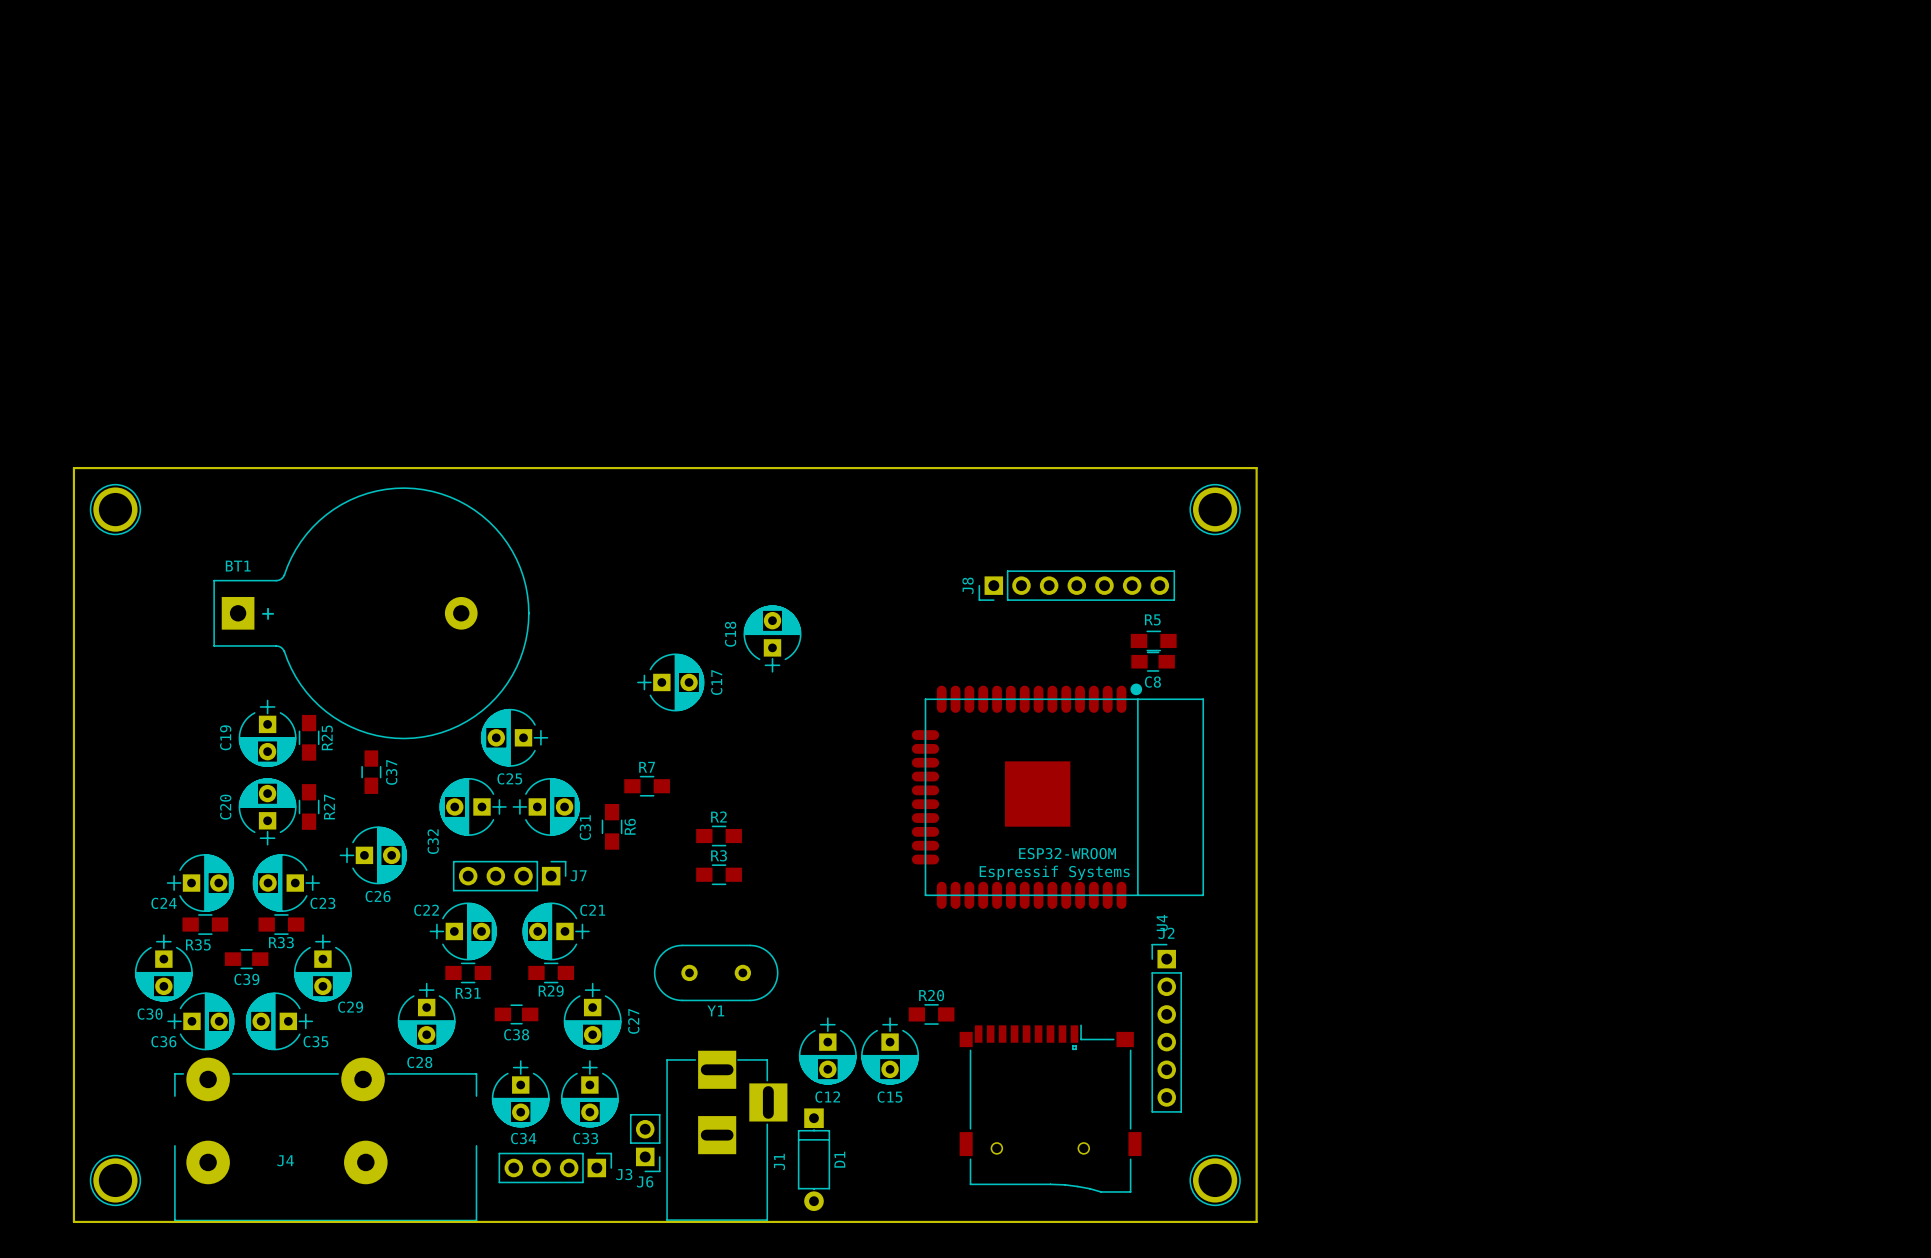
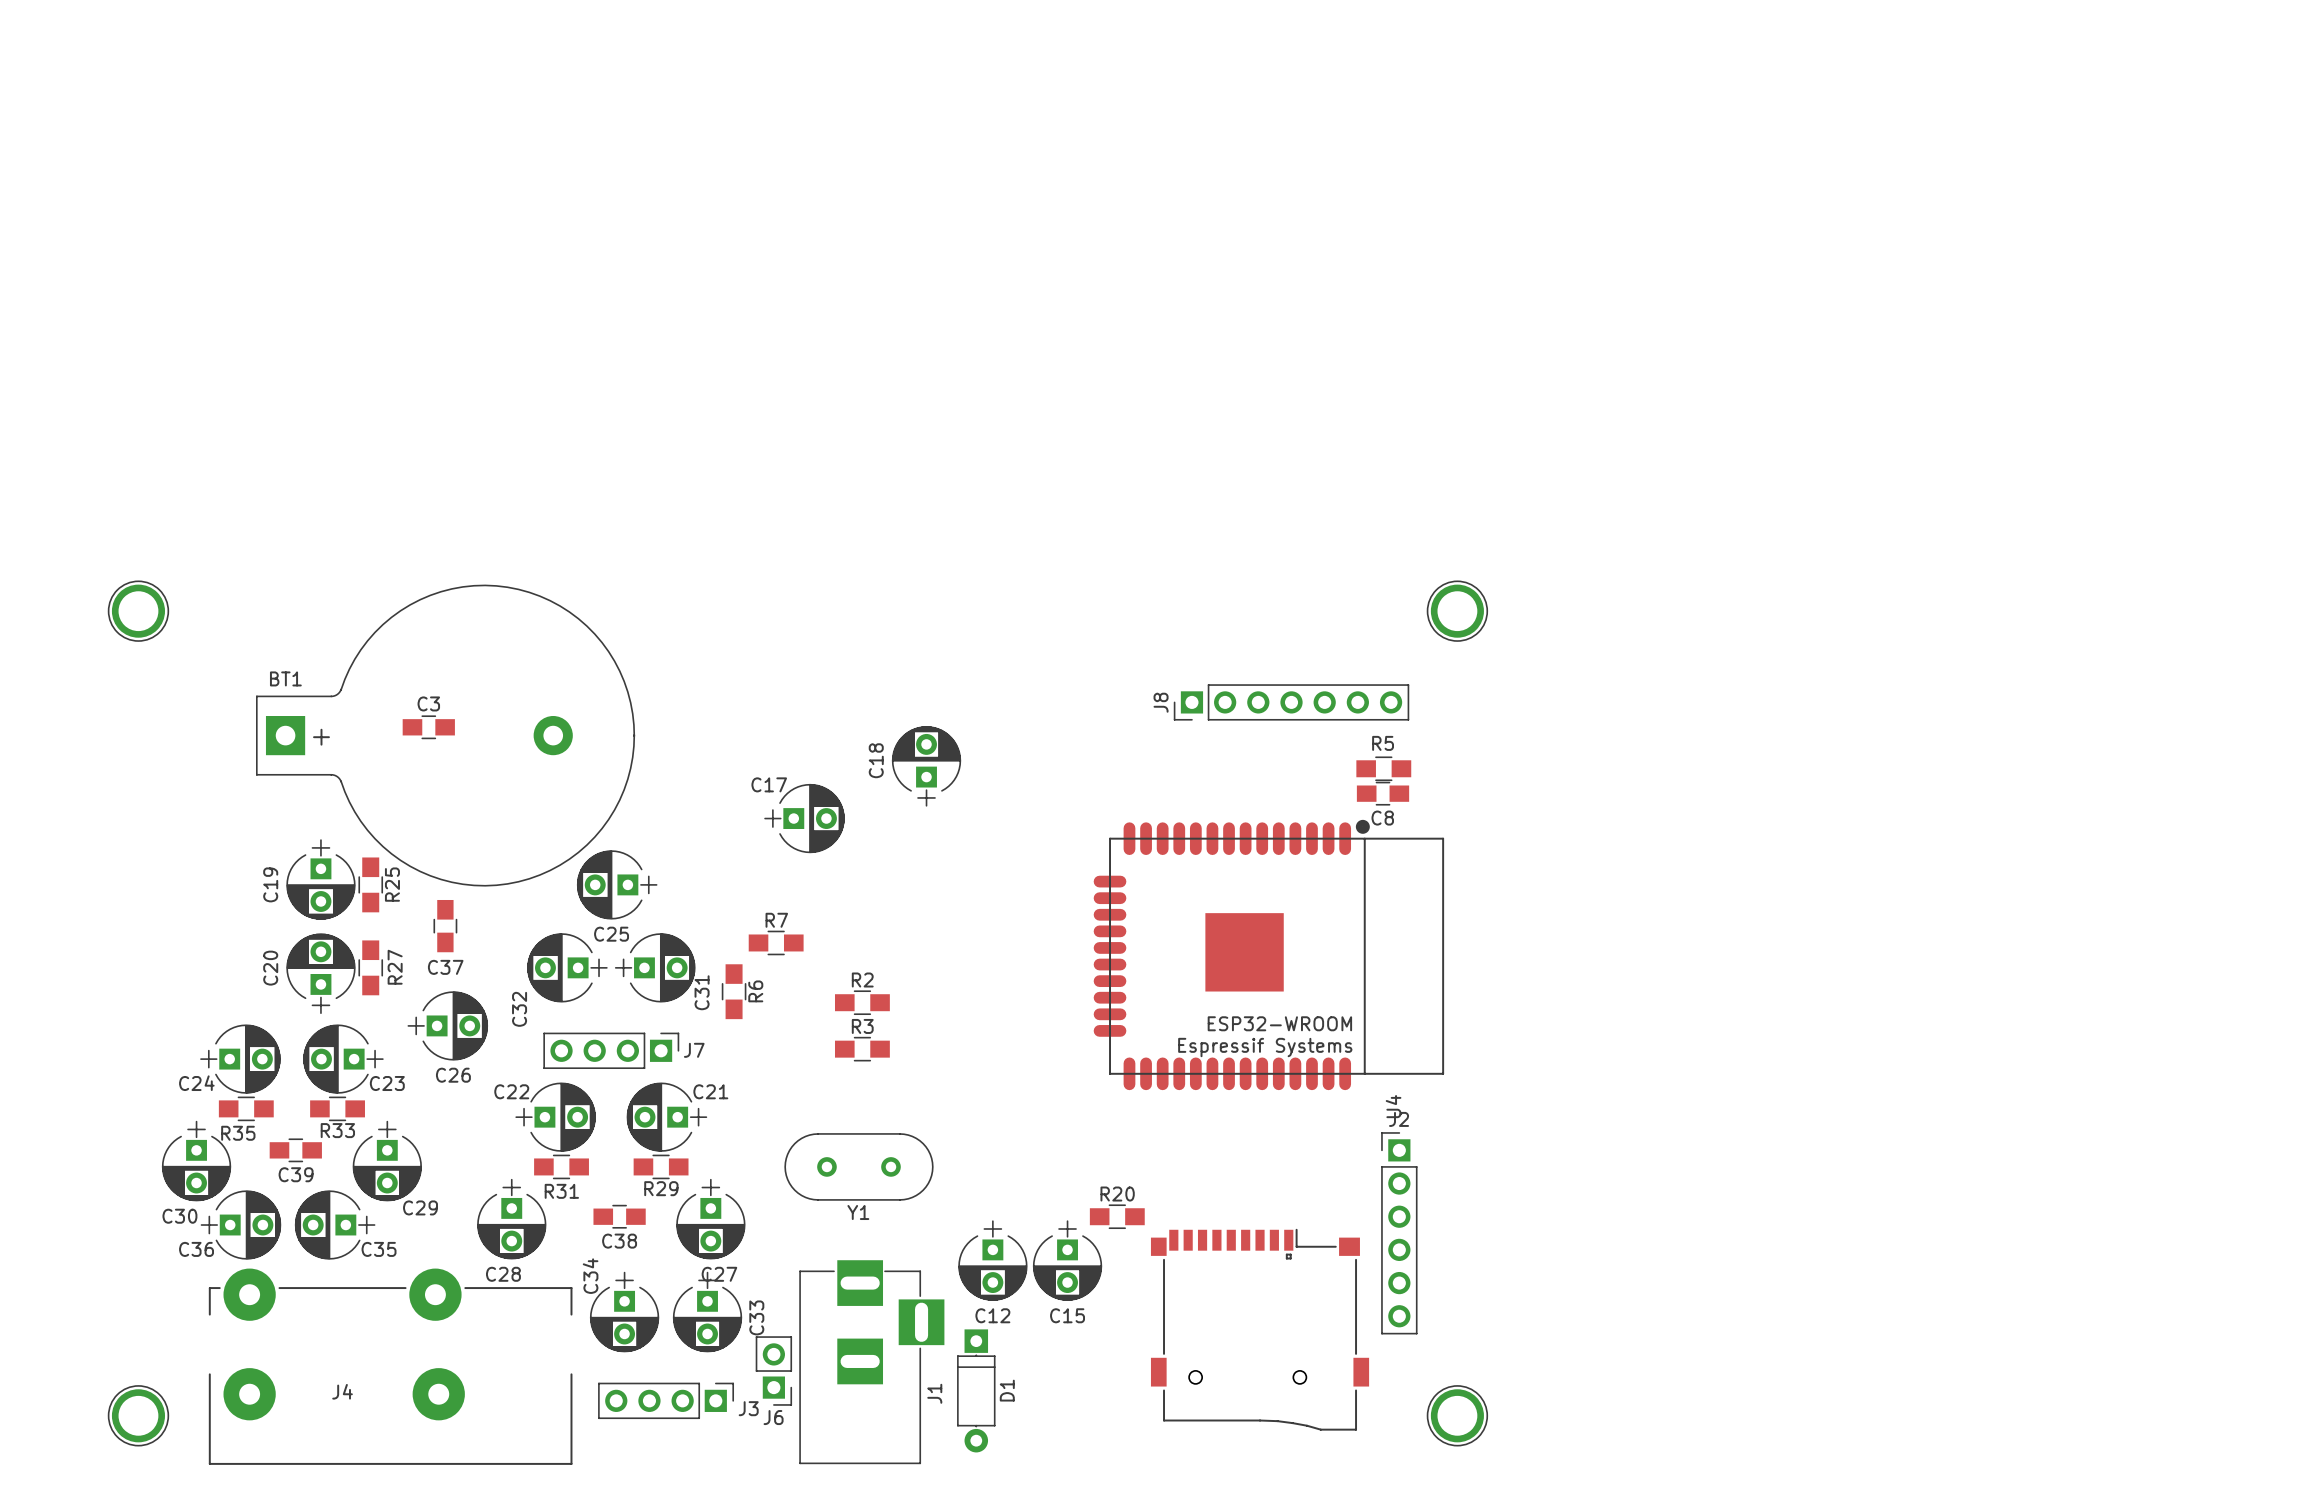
board edge: (73, 468) (1256, 468) (1256, 1221) (73, 1221) (73, 468) -> none
C3: none -> (428, 727)
C17 name rotation: 0° (716, 682) -> 90° clockwise (769, 784)
C17 name position: C17 (716, 682) -> C17 (769, 784)
C37 name rotation: 0° (391, 772) -> 90° clockwise (445, 967)
C37 name position: C37 (391, 772) -> C37 (445, 967)
C27 name rotation: 0° (633, 1021) -> 90° clockwise (719, 1274)
C27 name position: C27 (633, 1021) -> C27 (719, 1274)
C34 name rotation: 0° (523, 1138) -> 90° counterclockwise (590, 1276)
C34 name position: C34 (523, 1138) -> C34 (590, 1276)
C33 name rotation: 0° (585, 1138) -> 90° counterclockwise (756, 1317)
C33 name position: C33 (585, 1138) -> C33 (756, 1317)

